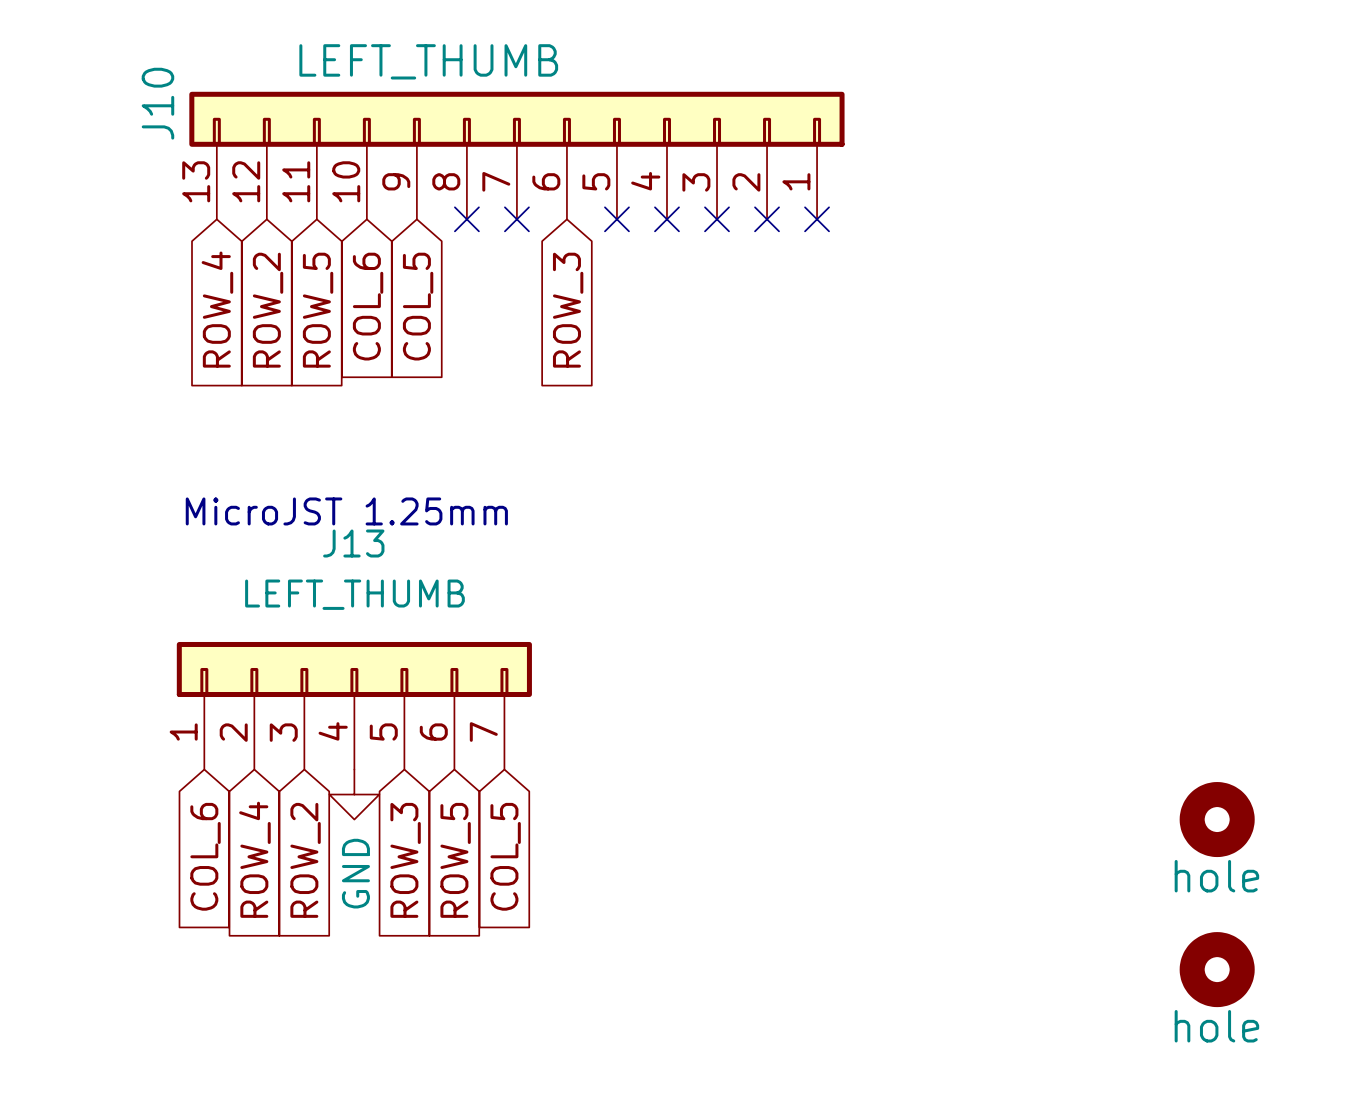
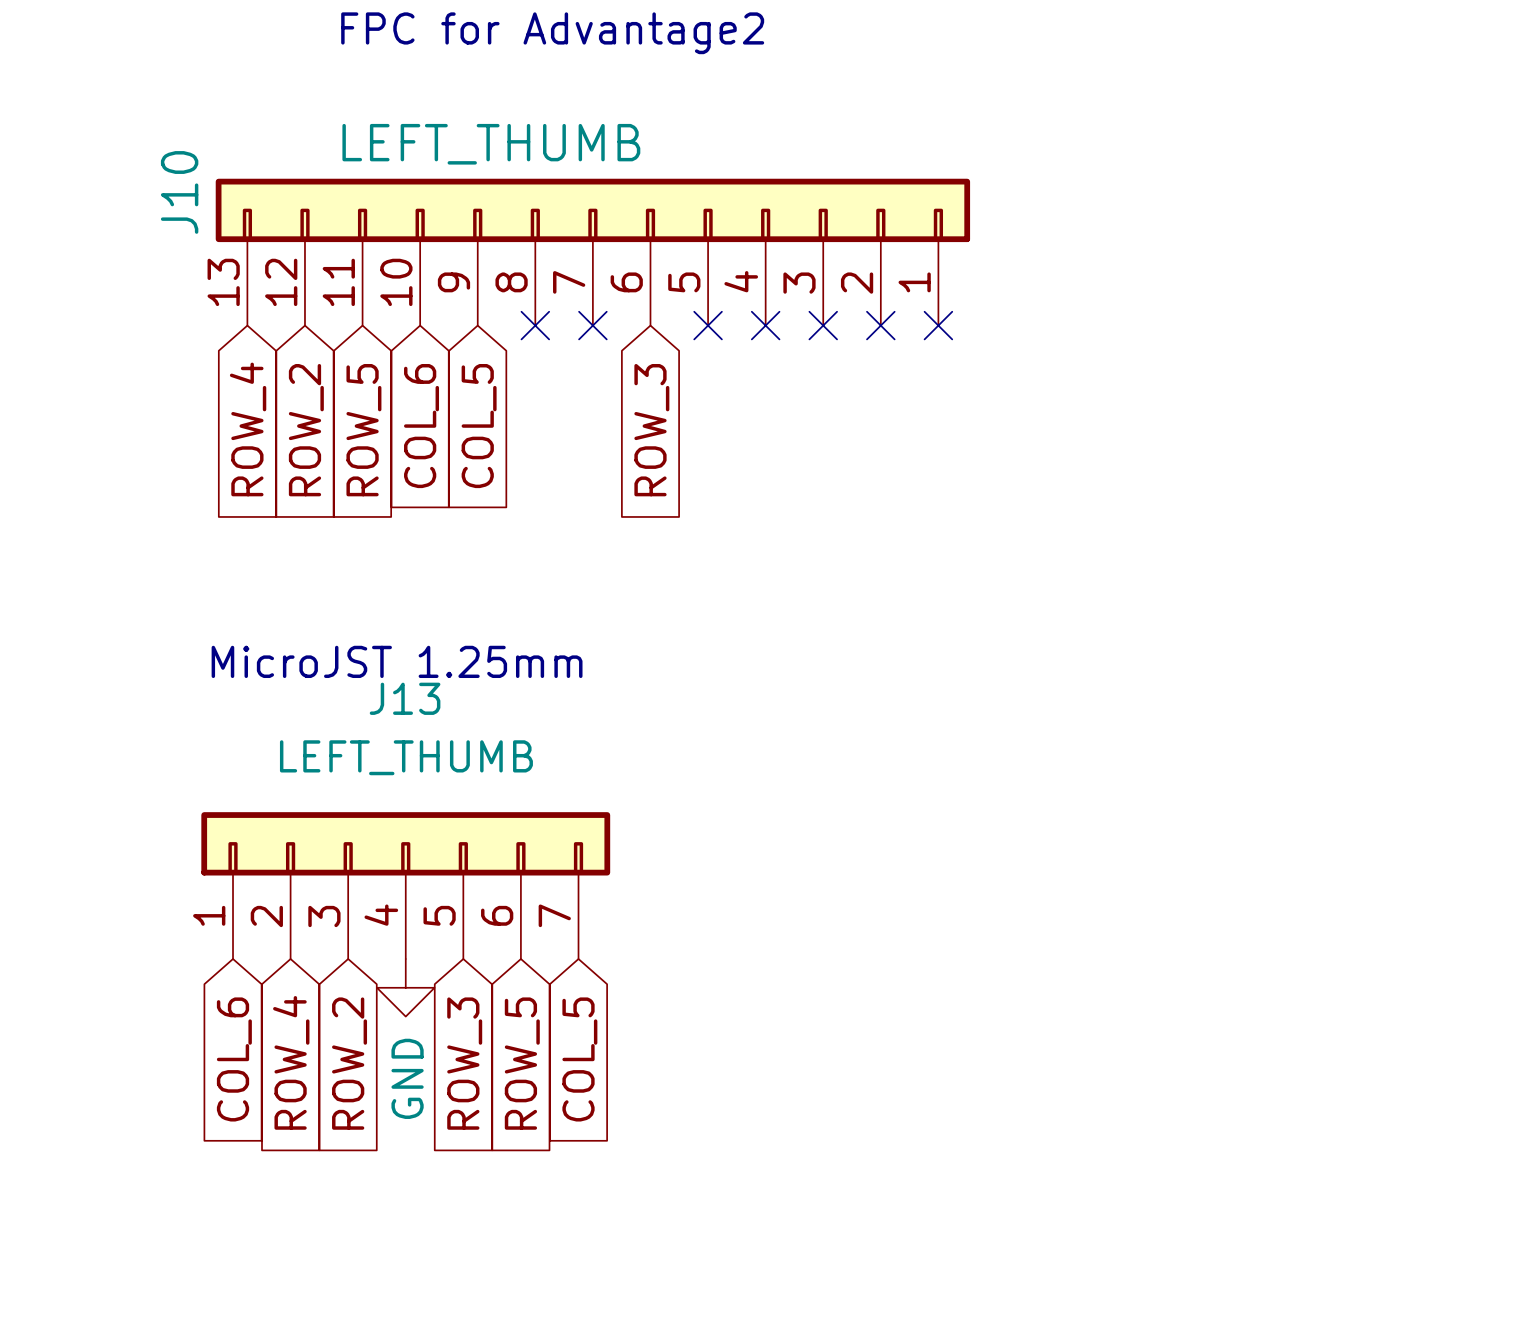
part: hole (1217, 819) -> none
part: hole (1217, 969) -> none

